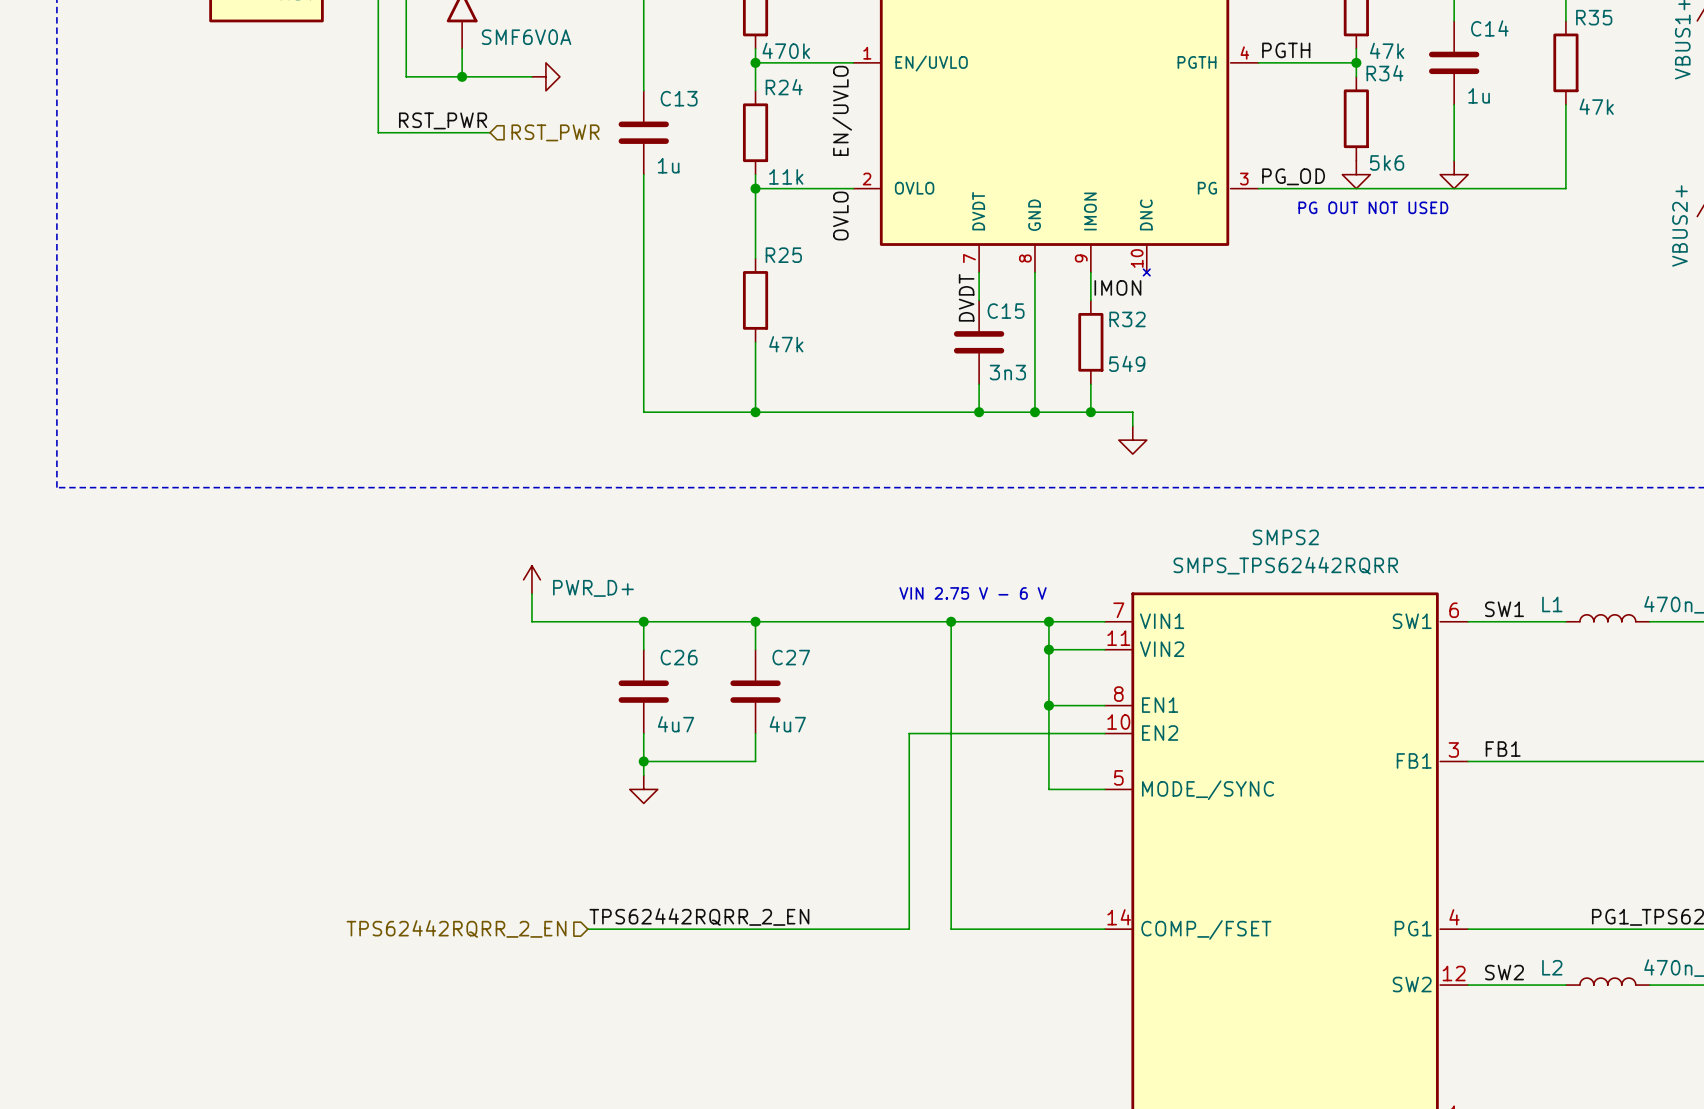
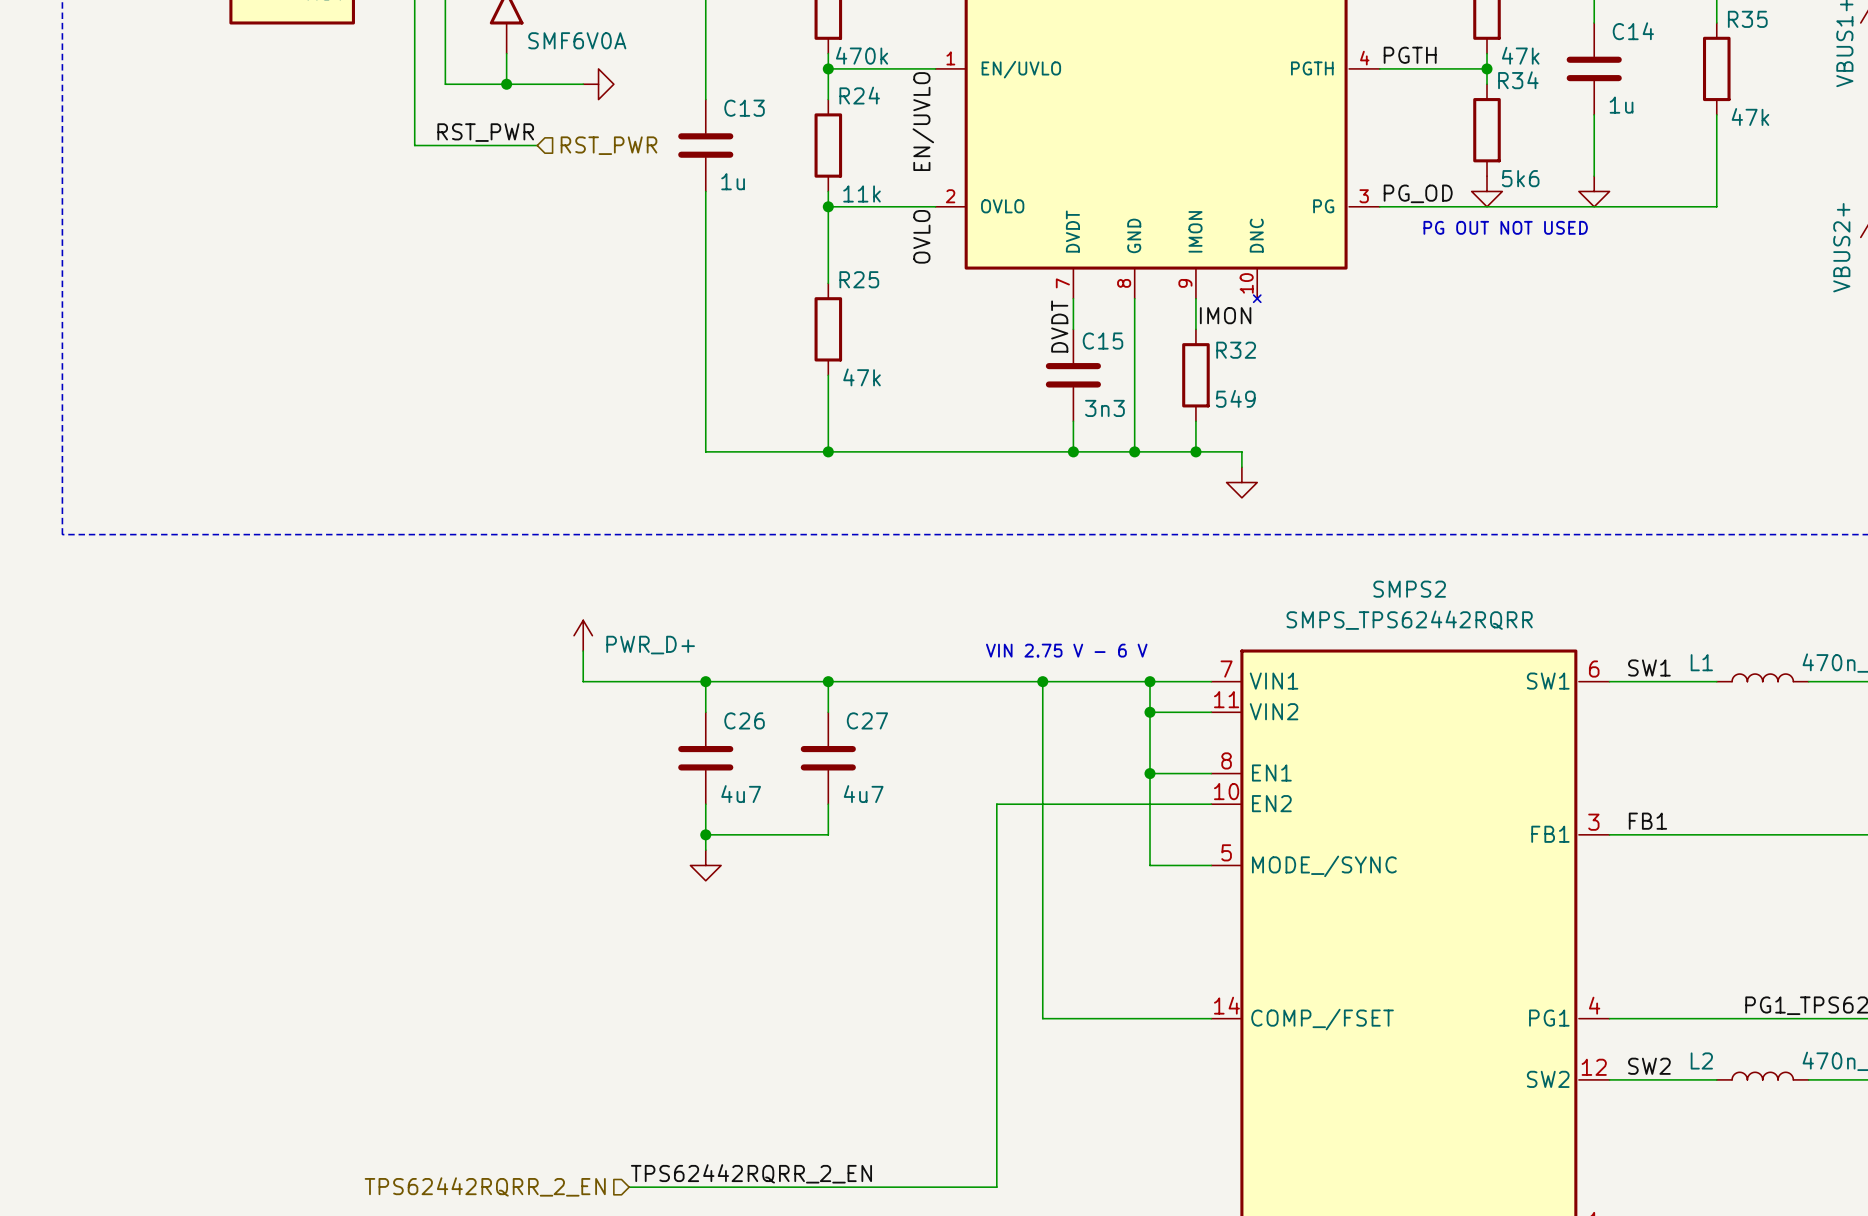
label position: TPS62442RQRR_2_EN (699, 917) -> TPS62442RQRR_2_EN (751, 1173)
hierarchical label position: TPS62442RQRR_2_EN (456, 928) -> TPS62442RQRR_2_EN (485, 1186)
wire: (587, 929) (909, 929) -> (629, 1187) (996, 1187) (996, 1018)

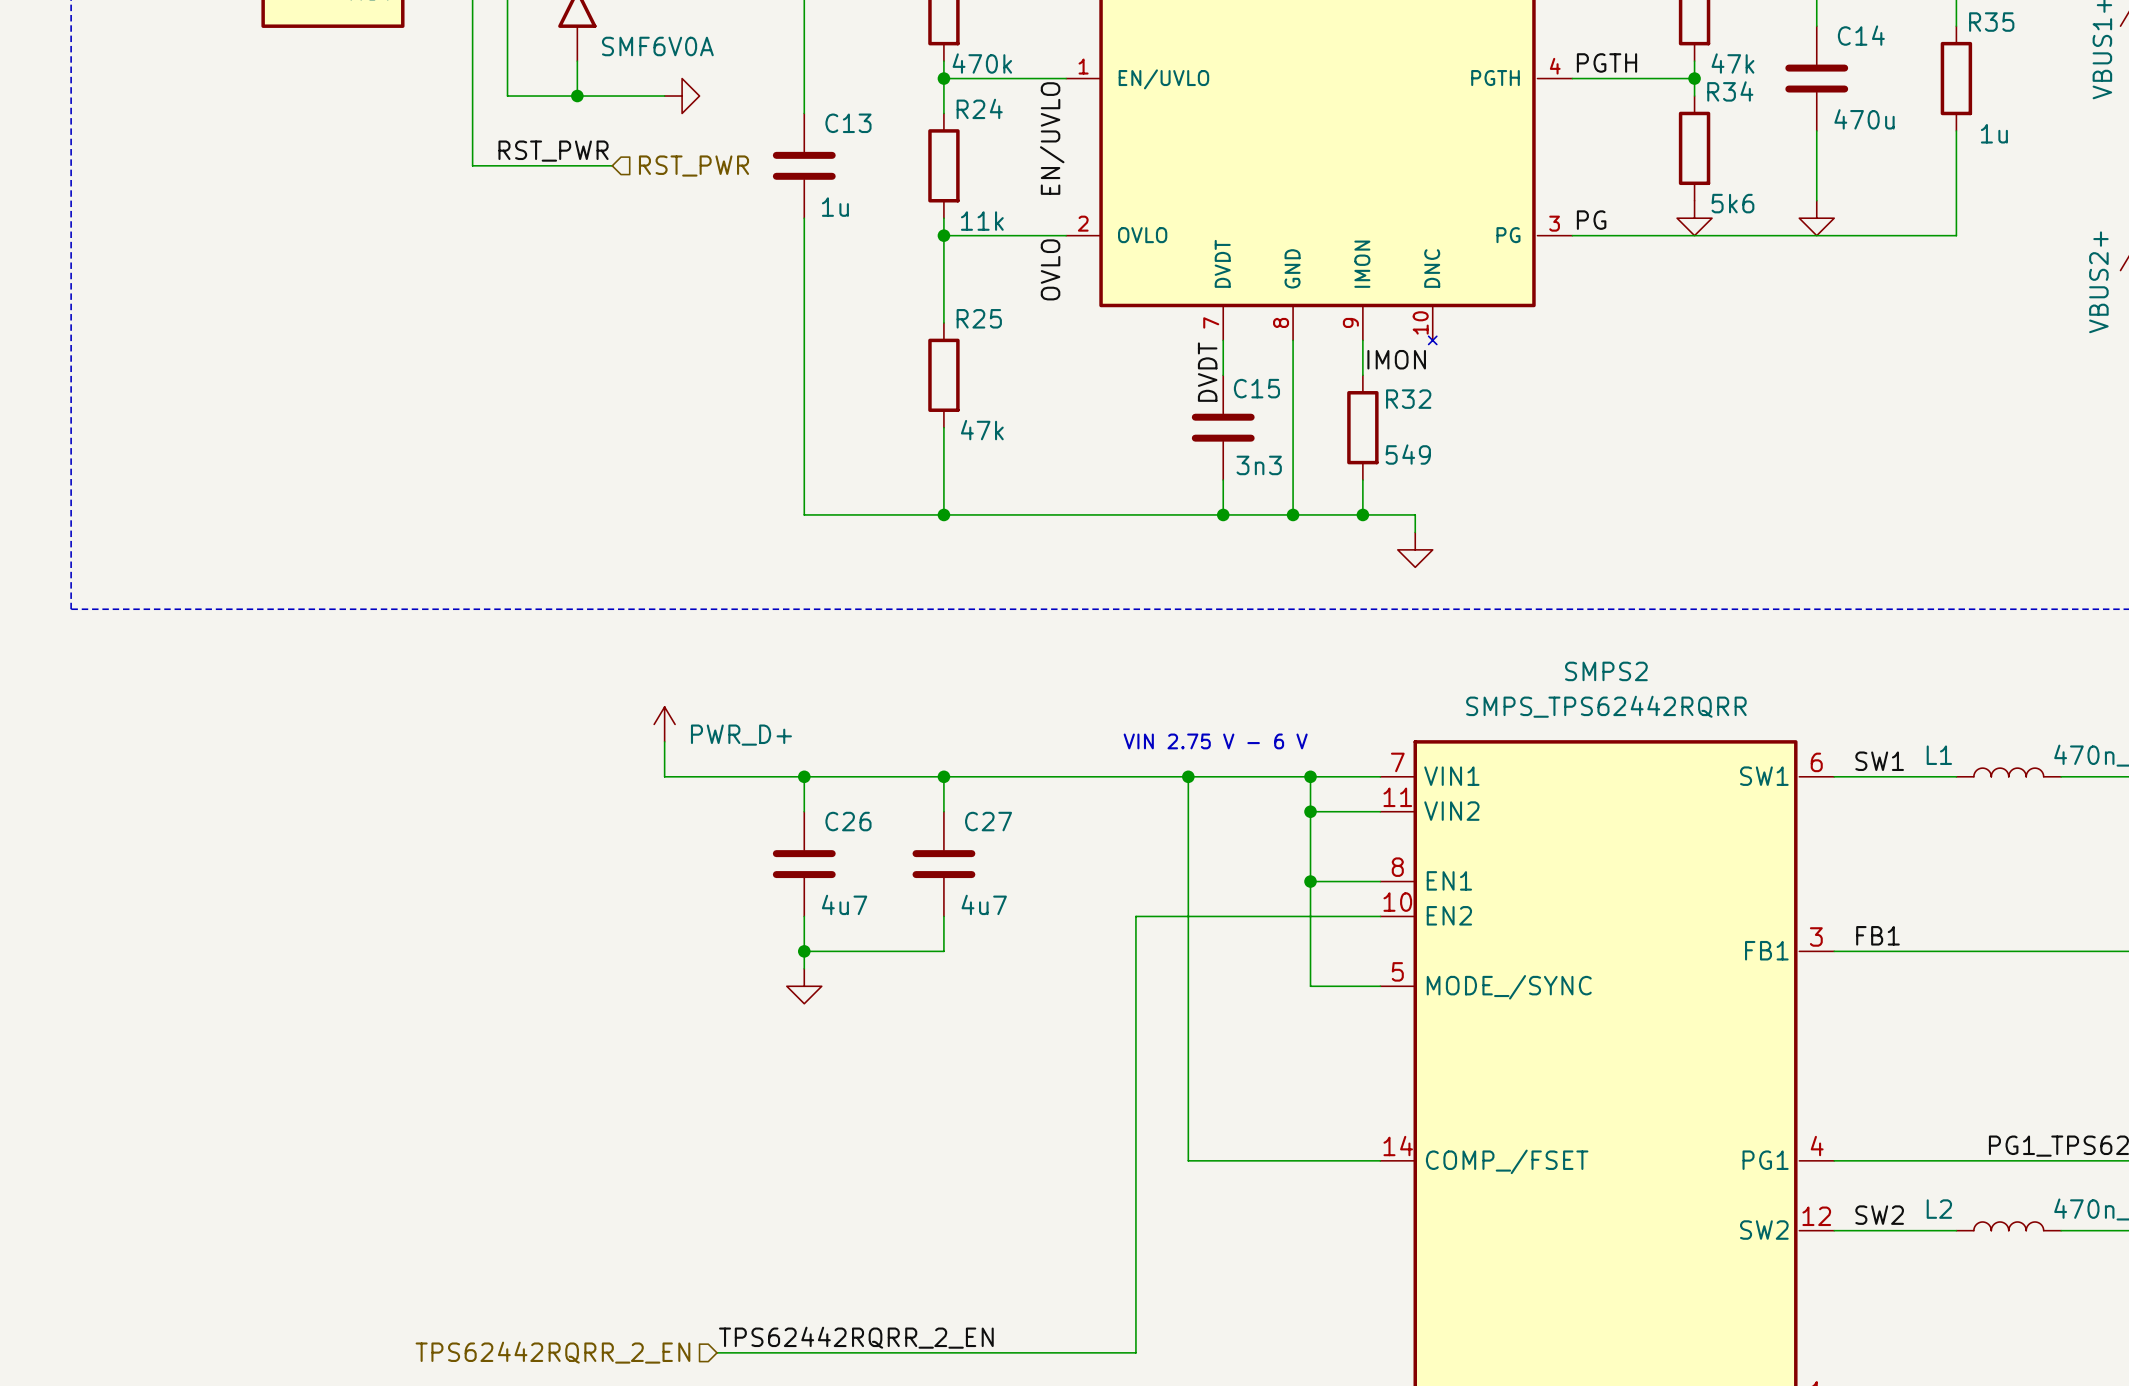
C14 value: 1u (1621, 105) -> 470u (1864, 119)
R35 value: 47k (1750, 117) -> 1u (1994, 133)
label: PG_OD (1418, 193) -> PG (1591, 220)
text: PG OUT NOT USED (1505, 227) -> none

